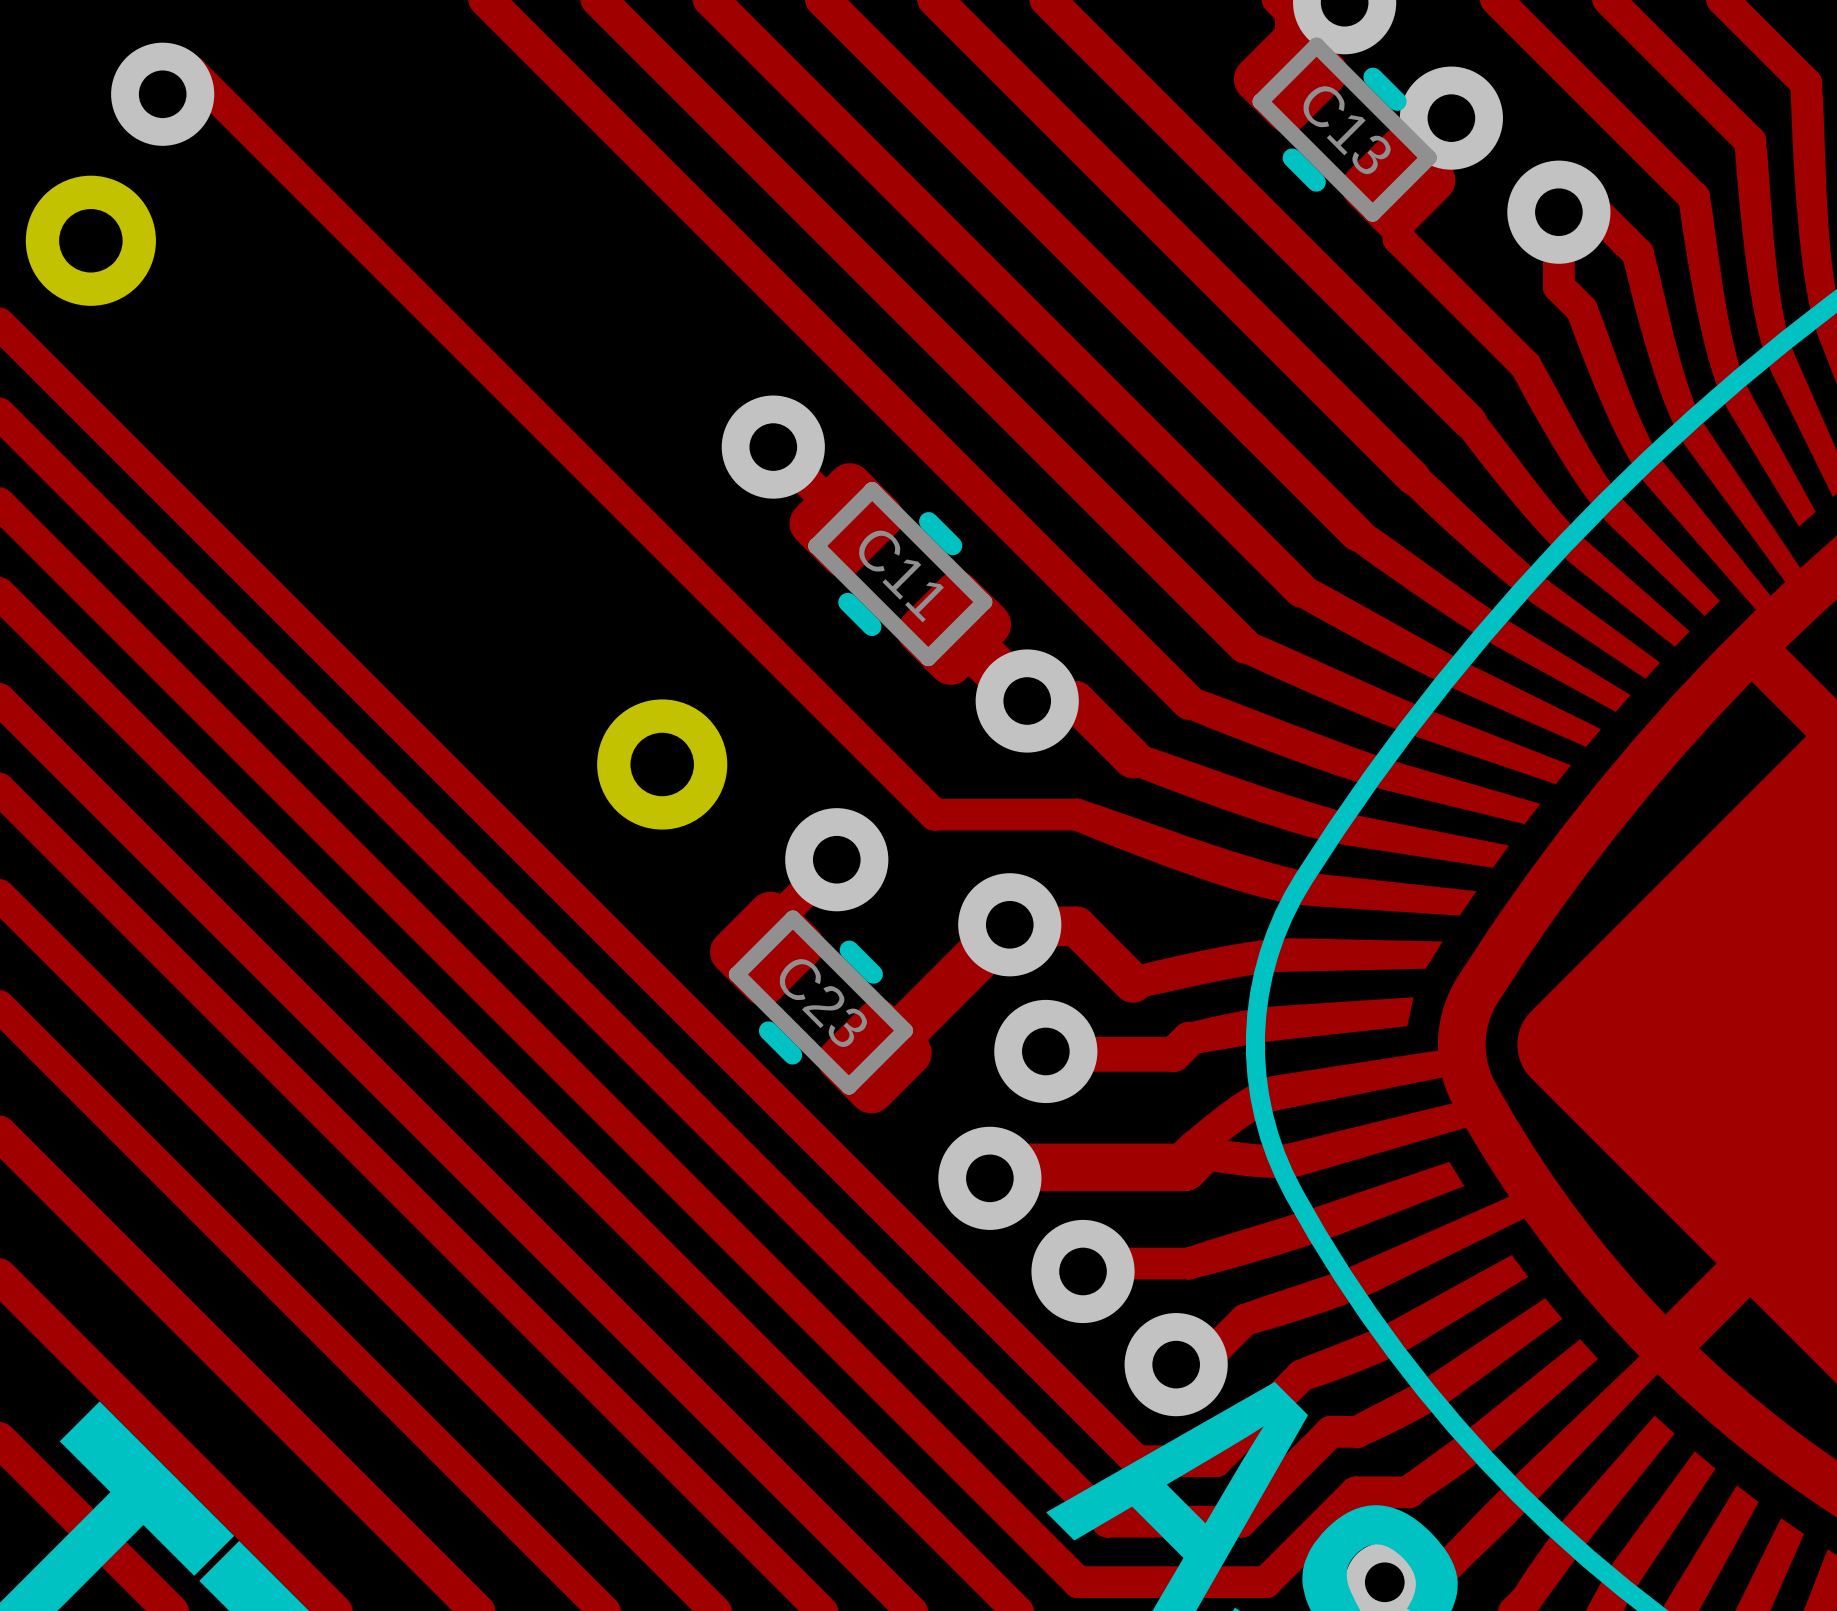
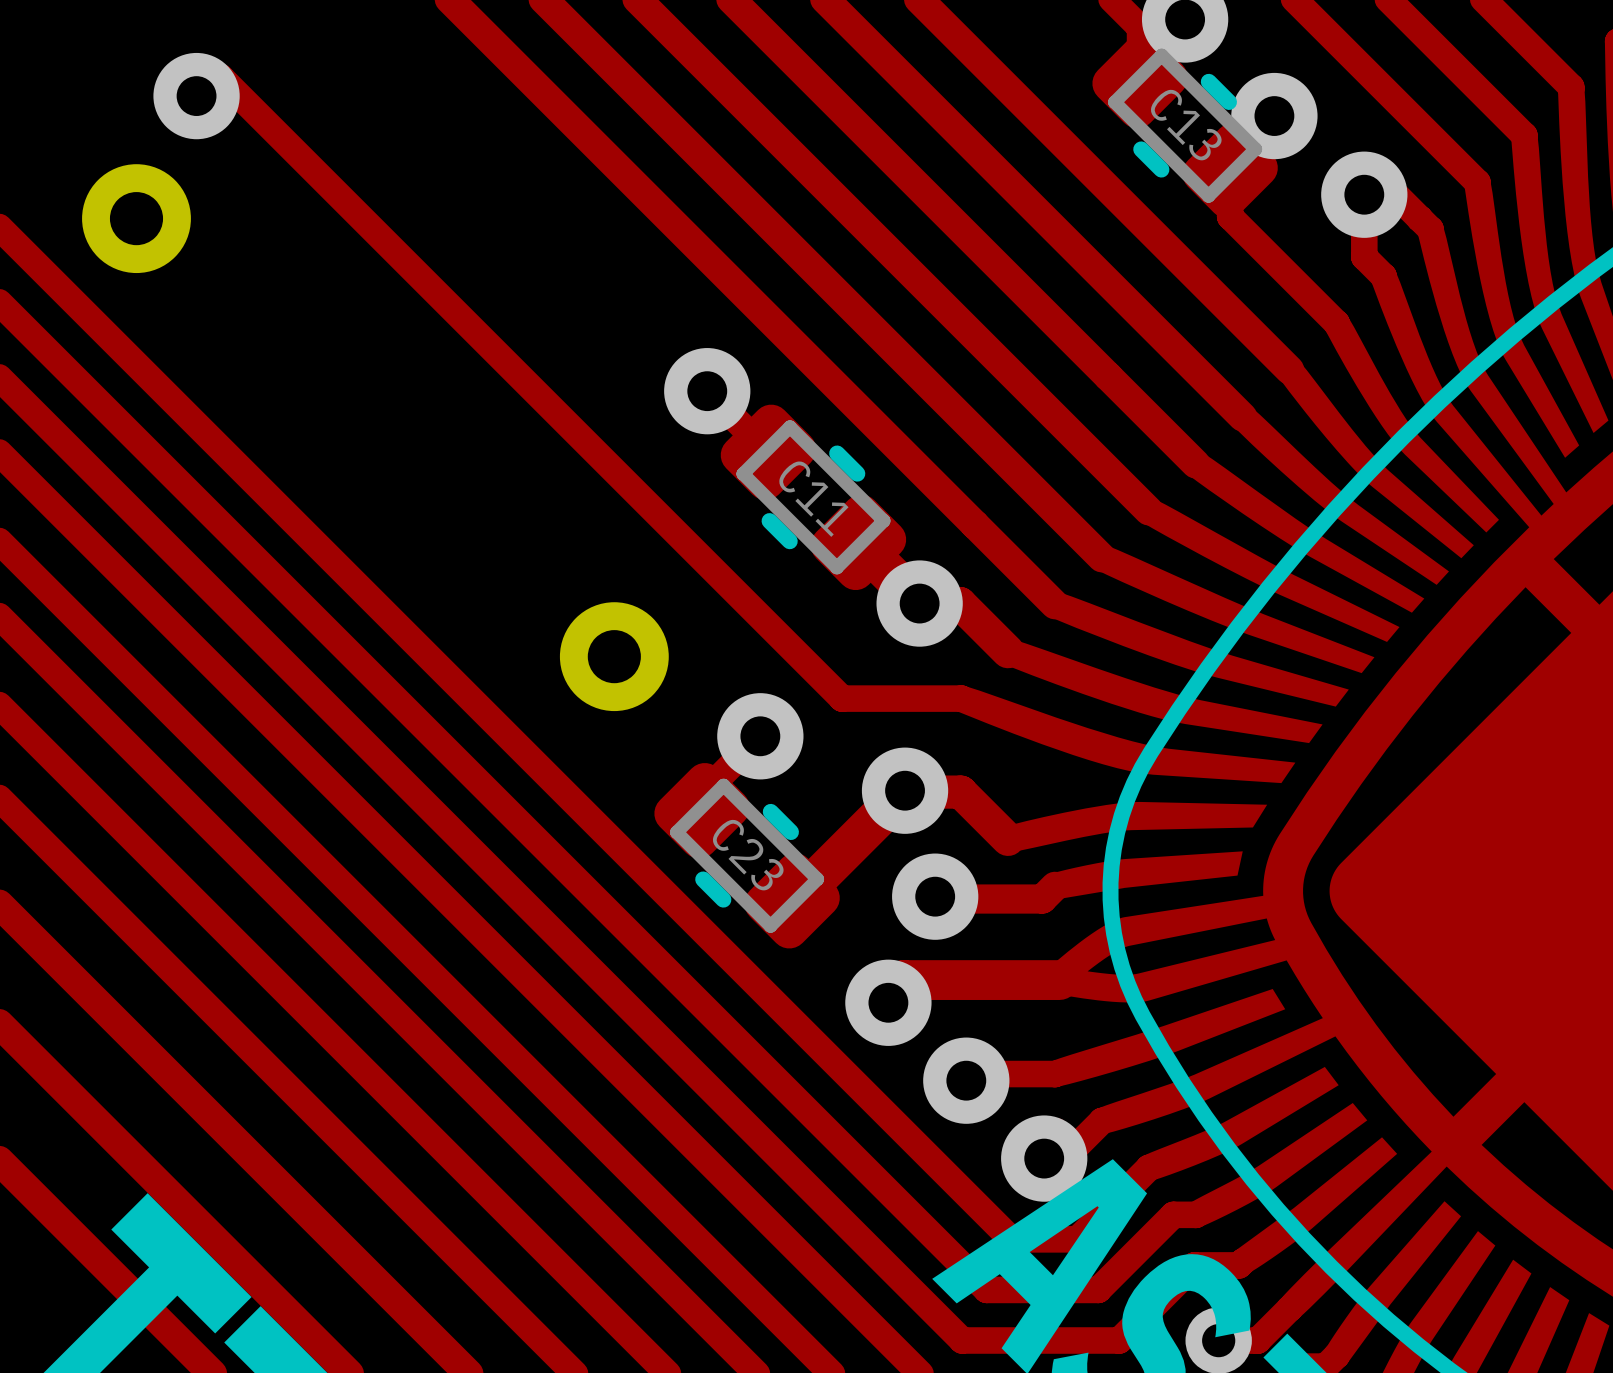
track: (1200, 1151) (1184, 1167) (1000, 1167) (989, 1178) -> (1059, 980) (903, 980) (888, 995) (888, 1002)

